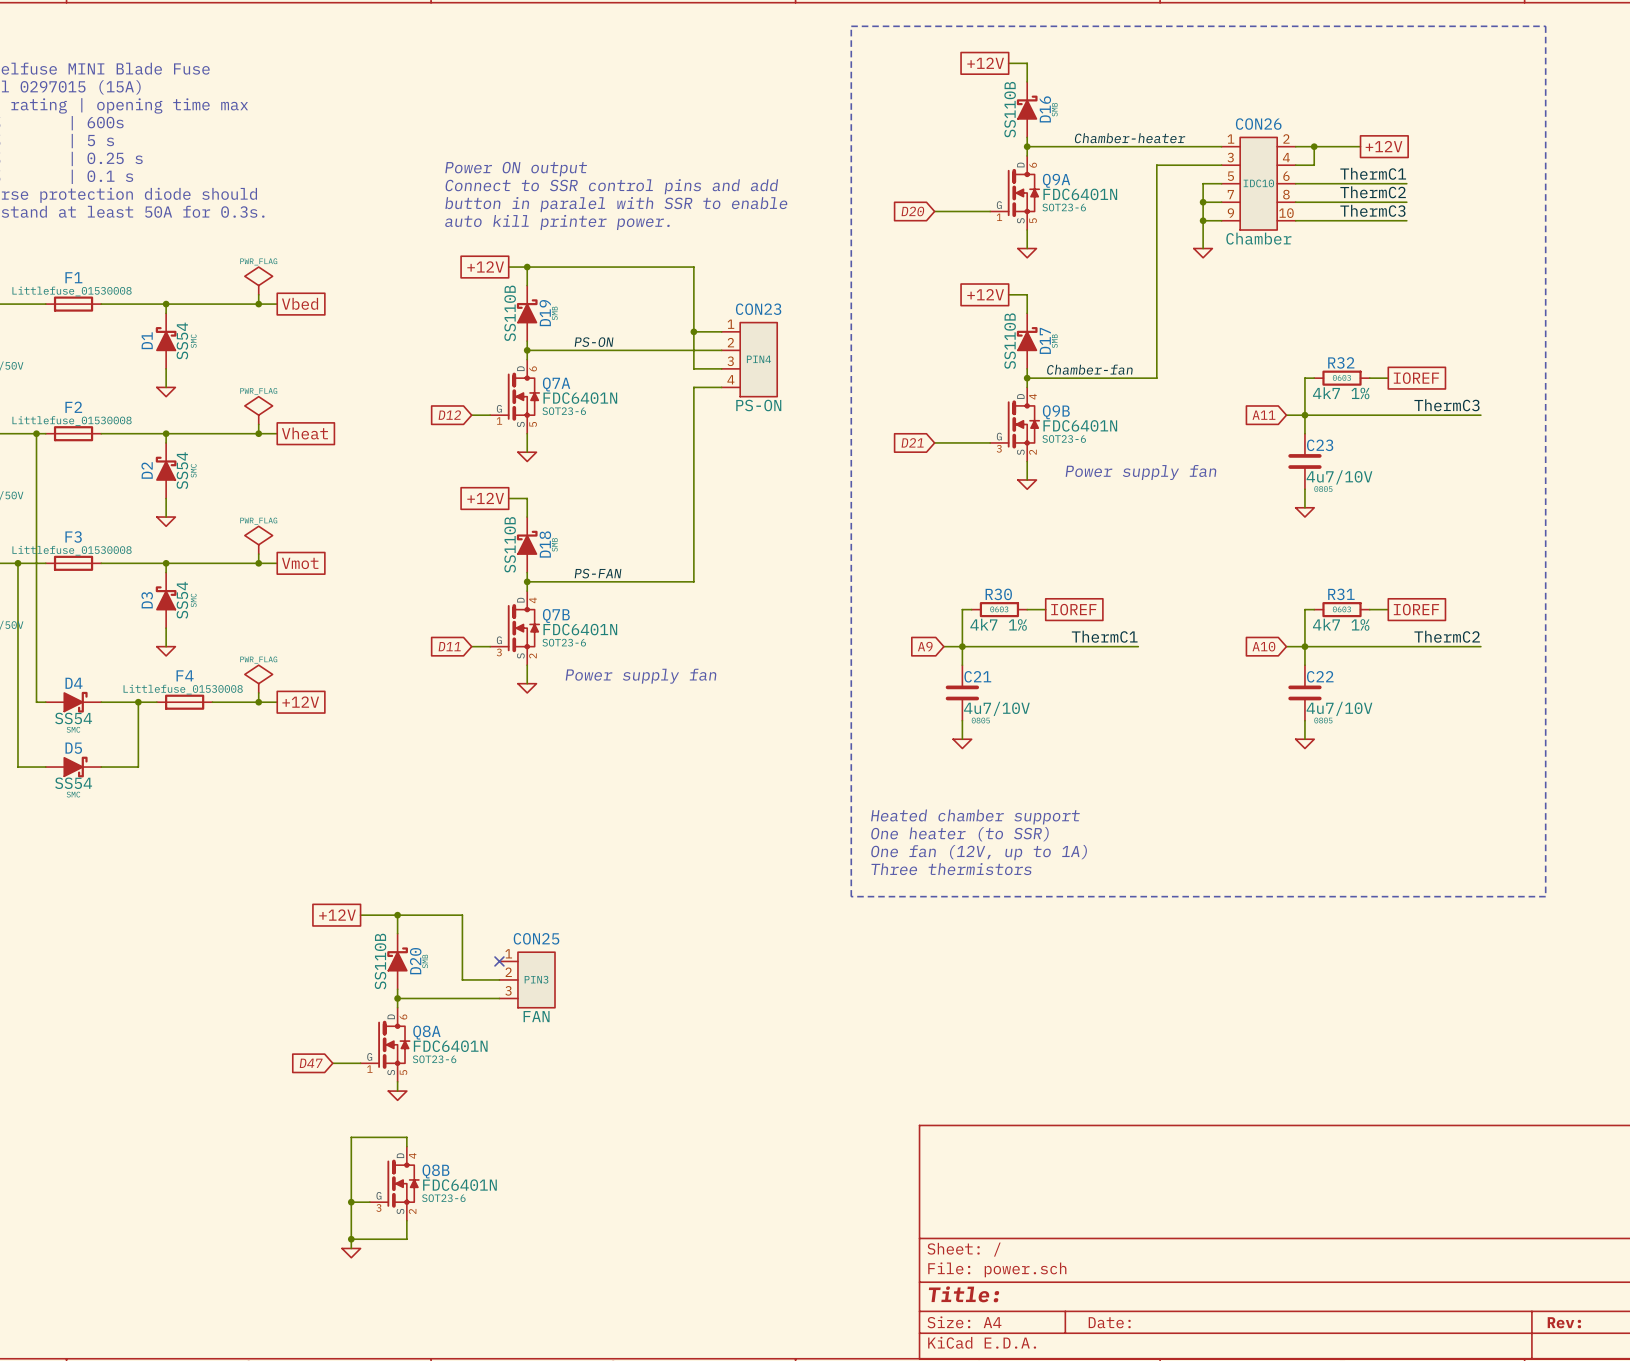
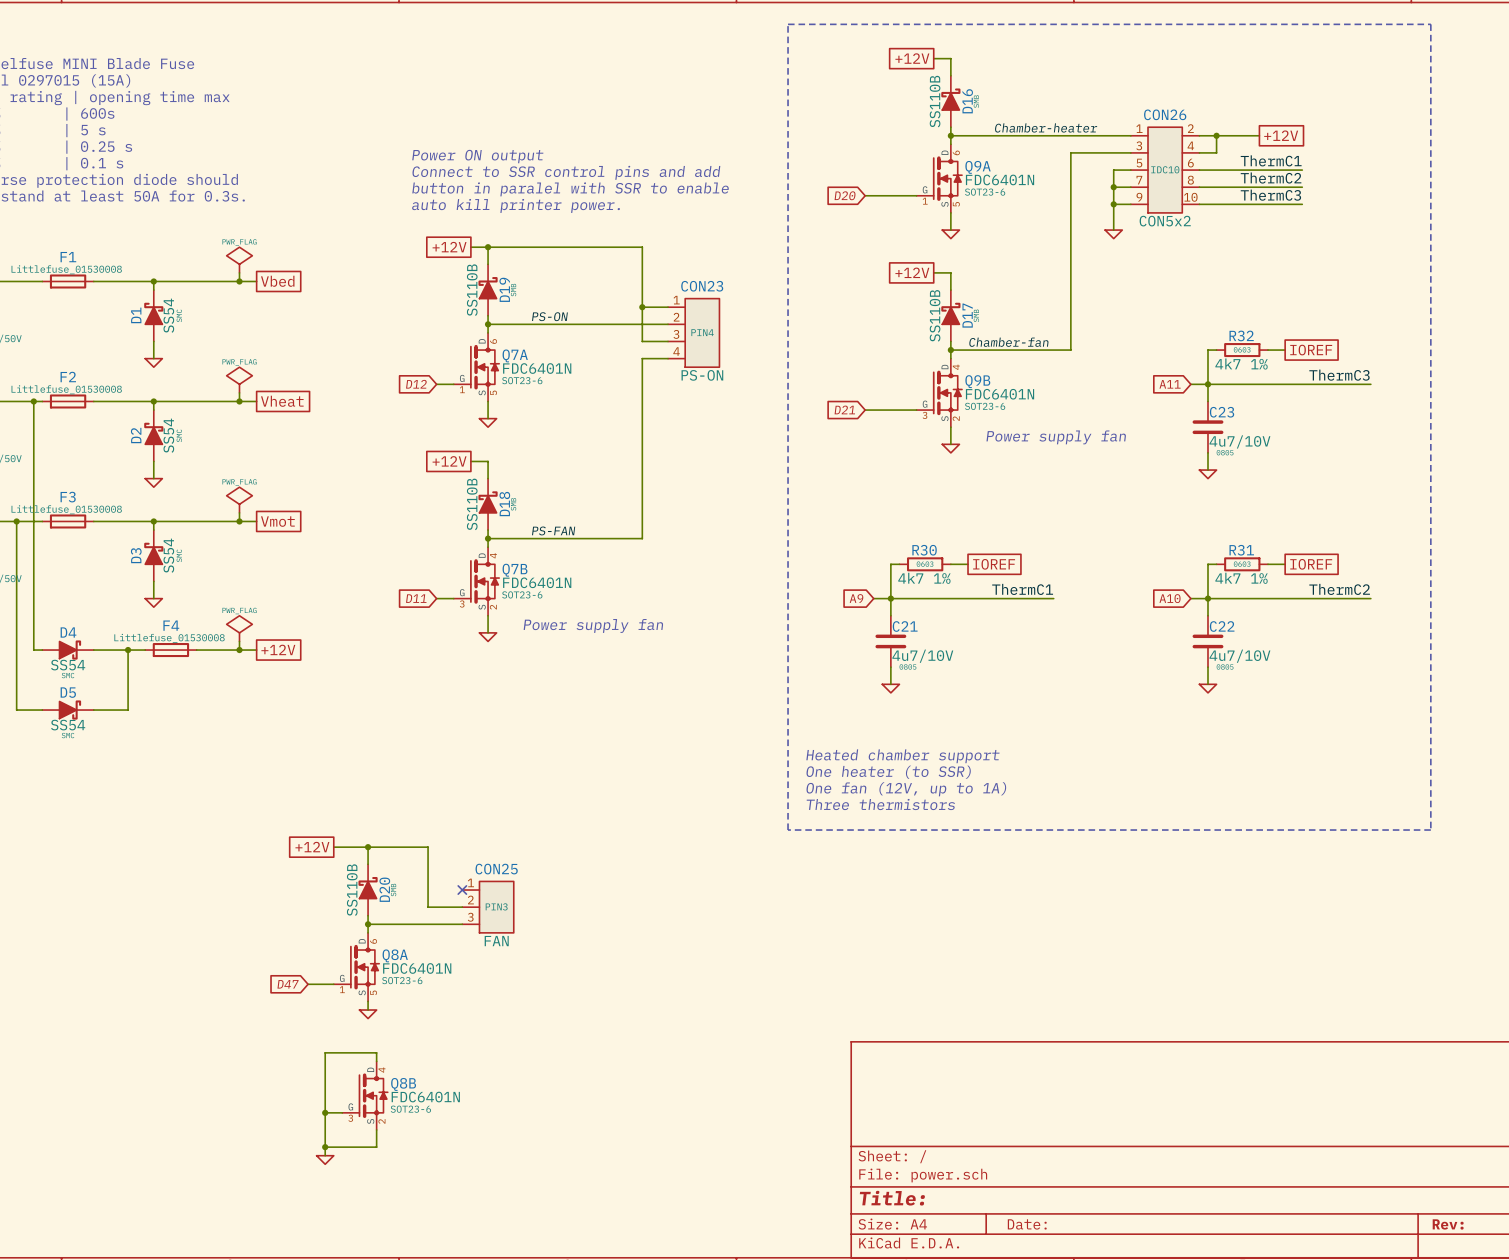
CON26 value: Chamber (1258, 238) -> CON5x2 (1165, 221)

